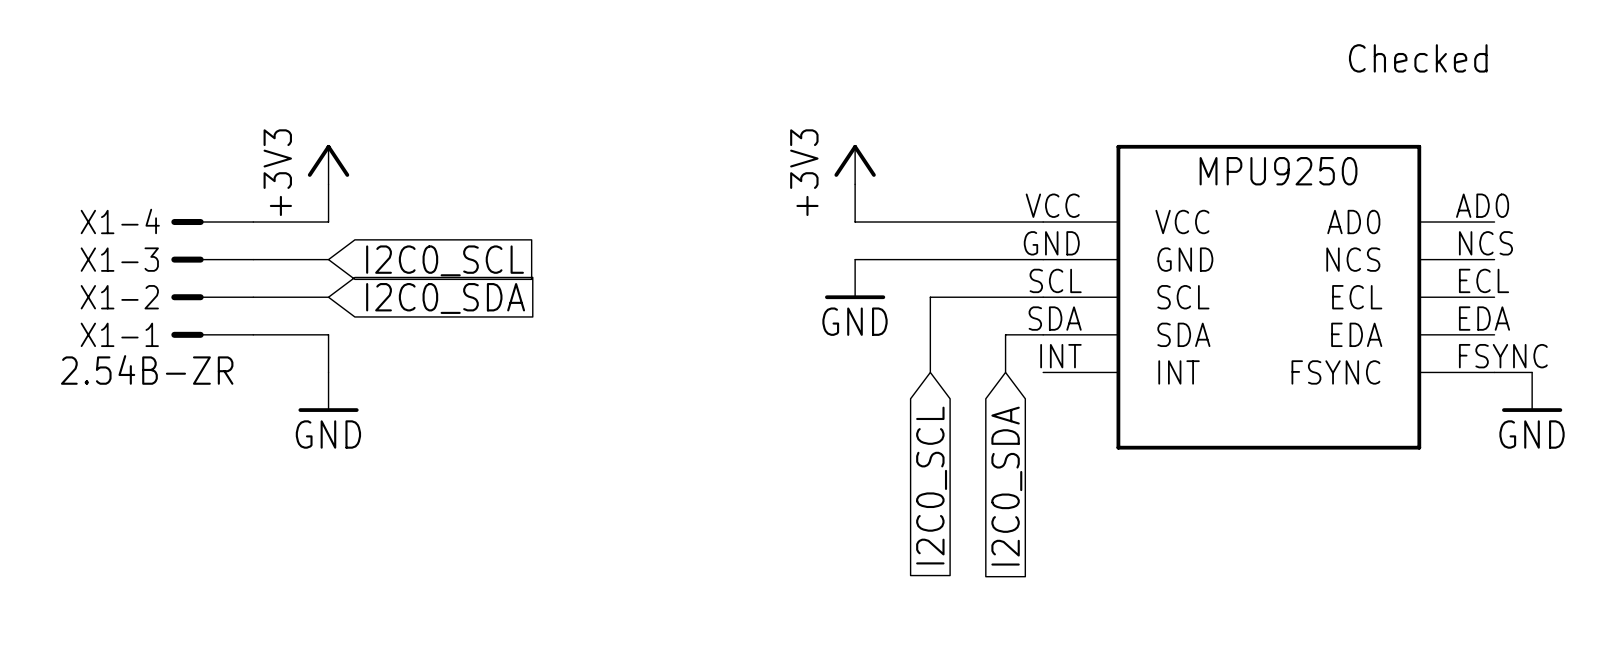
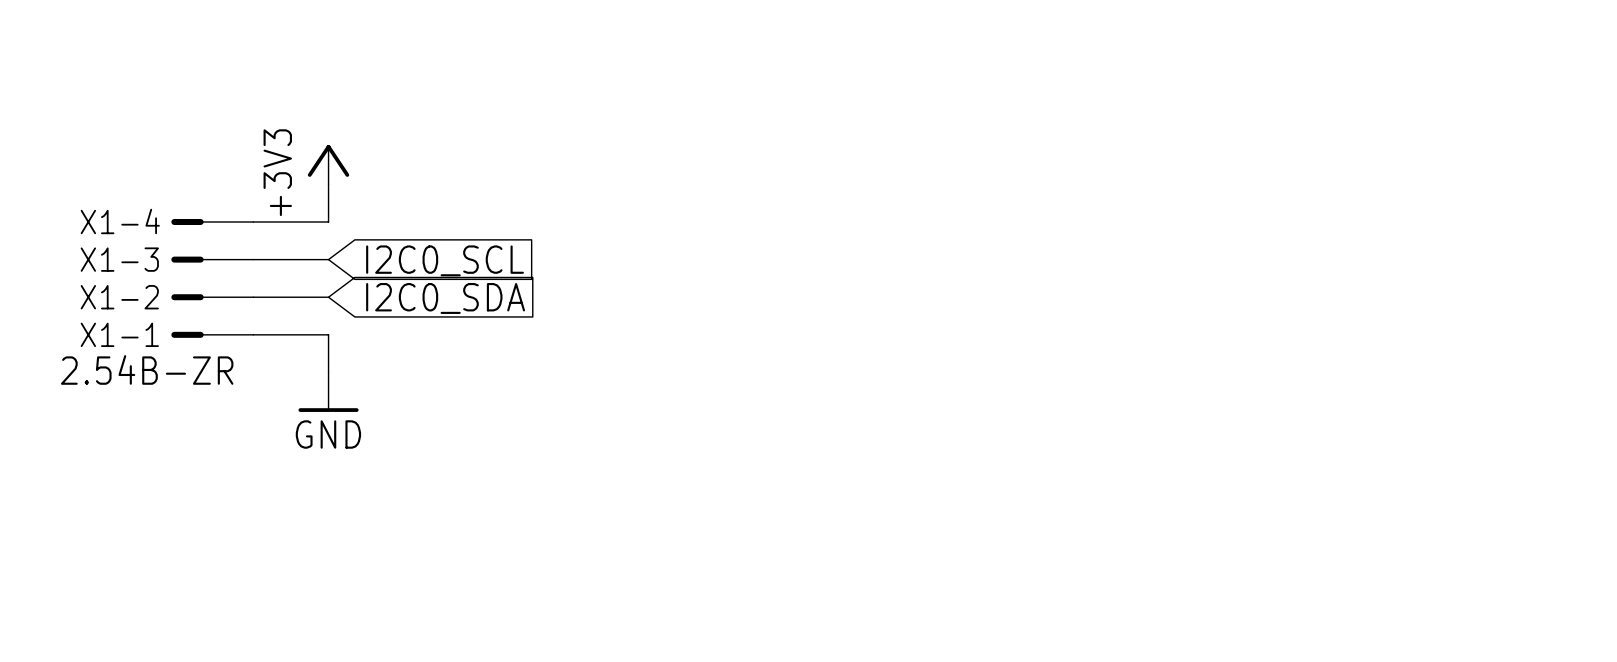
text: Checked (1418, 58) -> none
power symbol: +3V3 (855, 164) -> none
wire: (855, 184) (855, 222) (1043, 222) -> none
wire: (855, 259) (1043, 259) -> none
power symbol: GND (855, 279) -> none
wire: (1043, 297) (930, 297) (930, 372) -> none
part: (1268, 297) -> none
wire: (1043, 334) (1005, 334) (1005, 372) -> none
wire: (1494, 372) (1532, 372) -> none
power symbol: GND (1532, 392) -> none
global label: I2C0_SCL (931, 485) -> none
global label: I2C0_SDA (1006, 486) -> none

